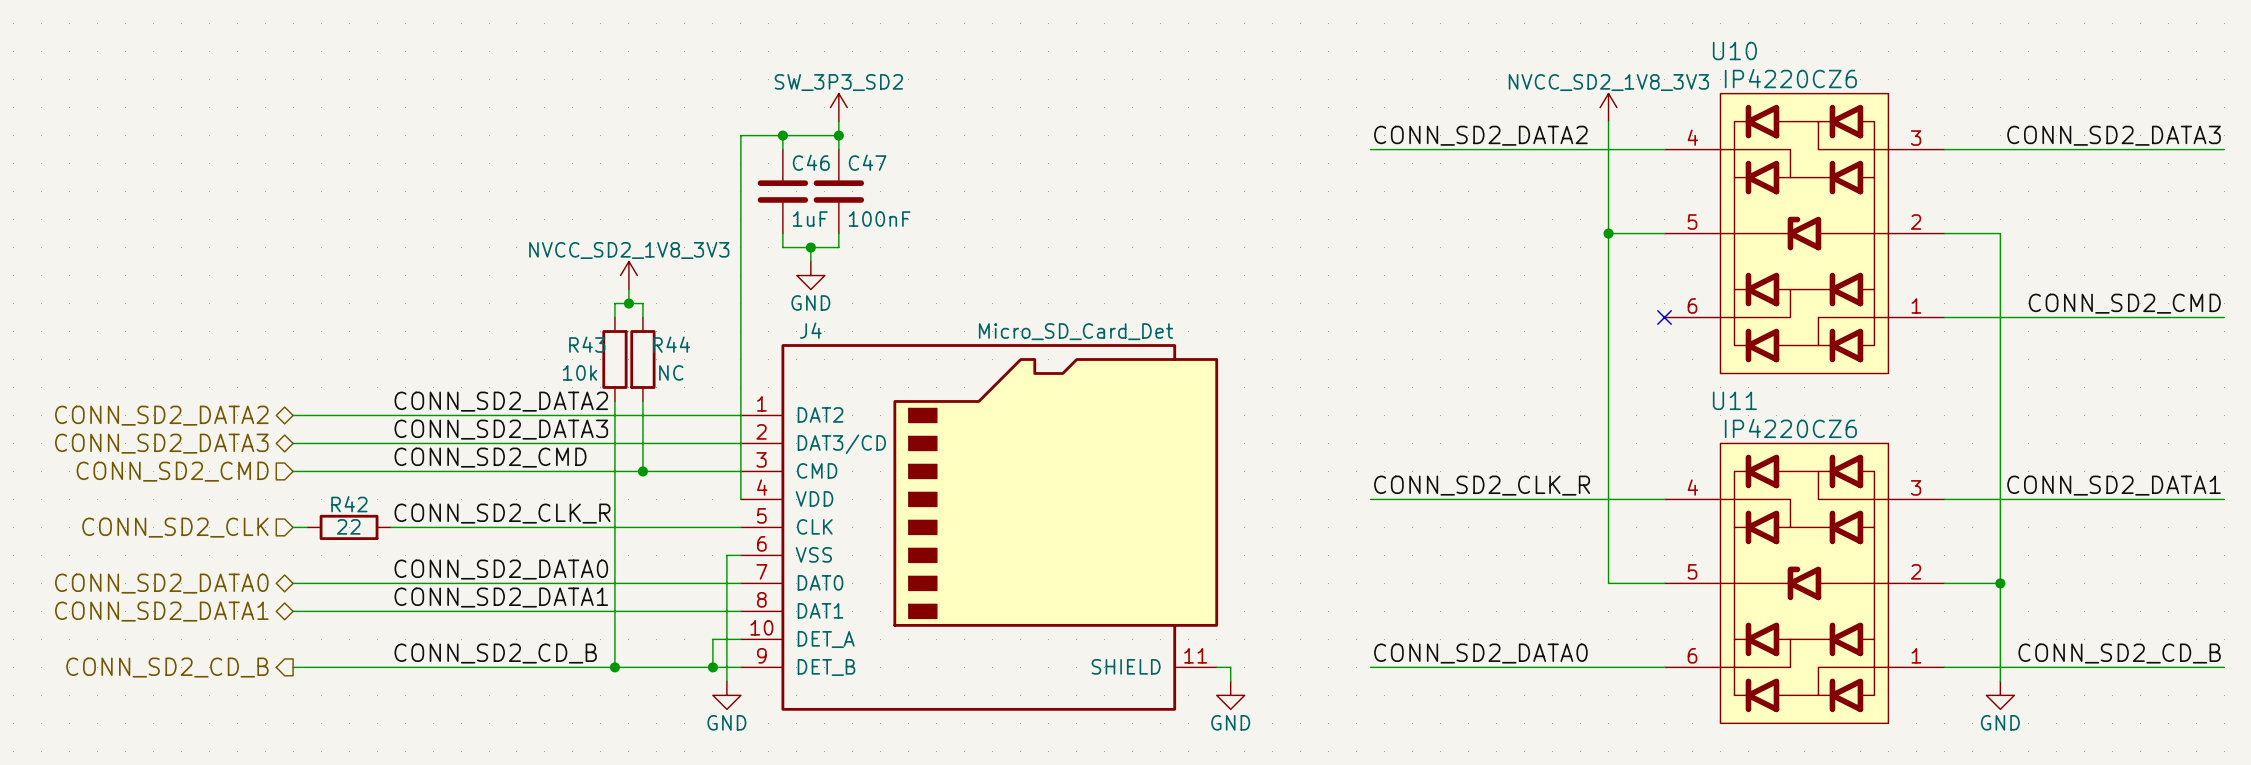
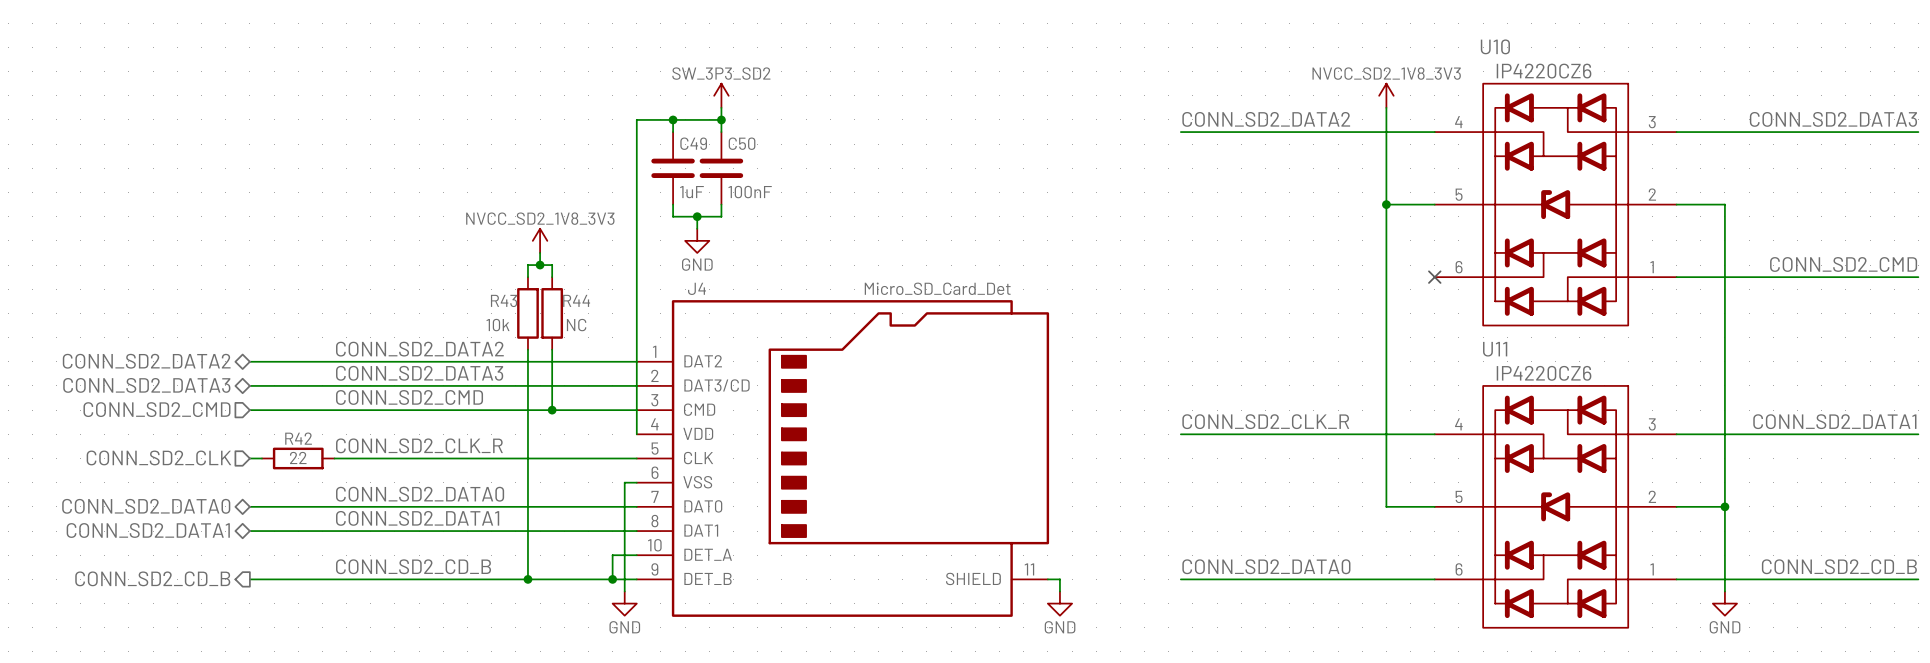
C46 name: C46 (811, 162) -> C49 (693, 143)
C47 name: C47 (867, 162) -> C50 (742, 143)

